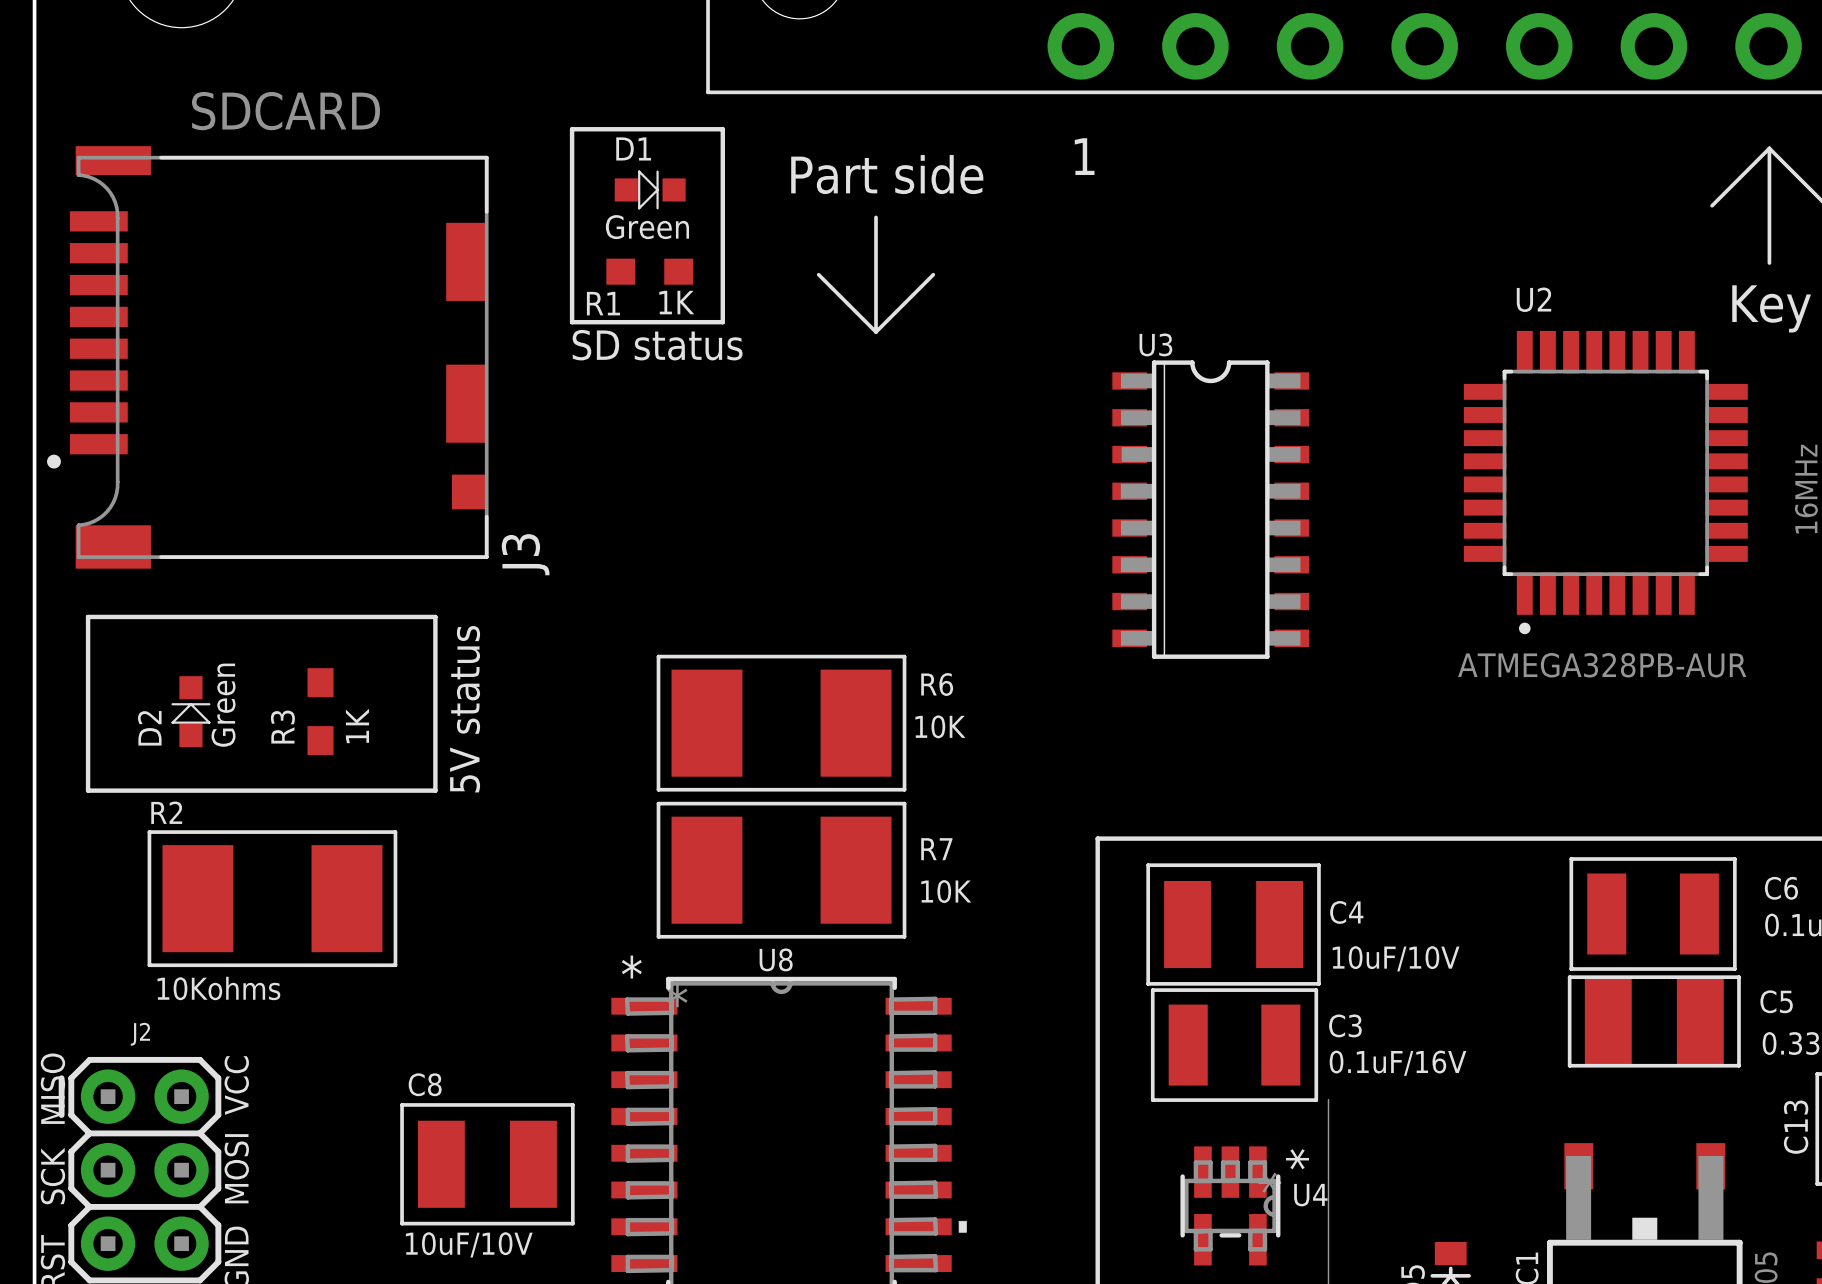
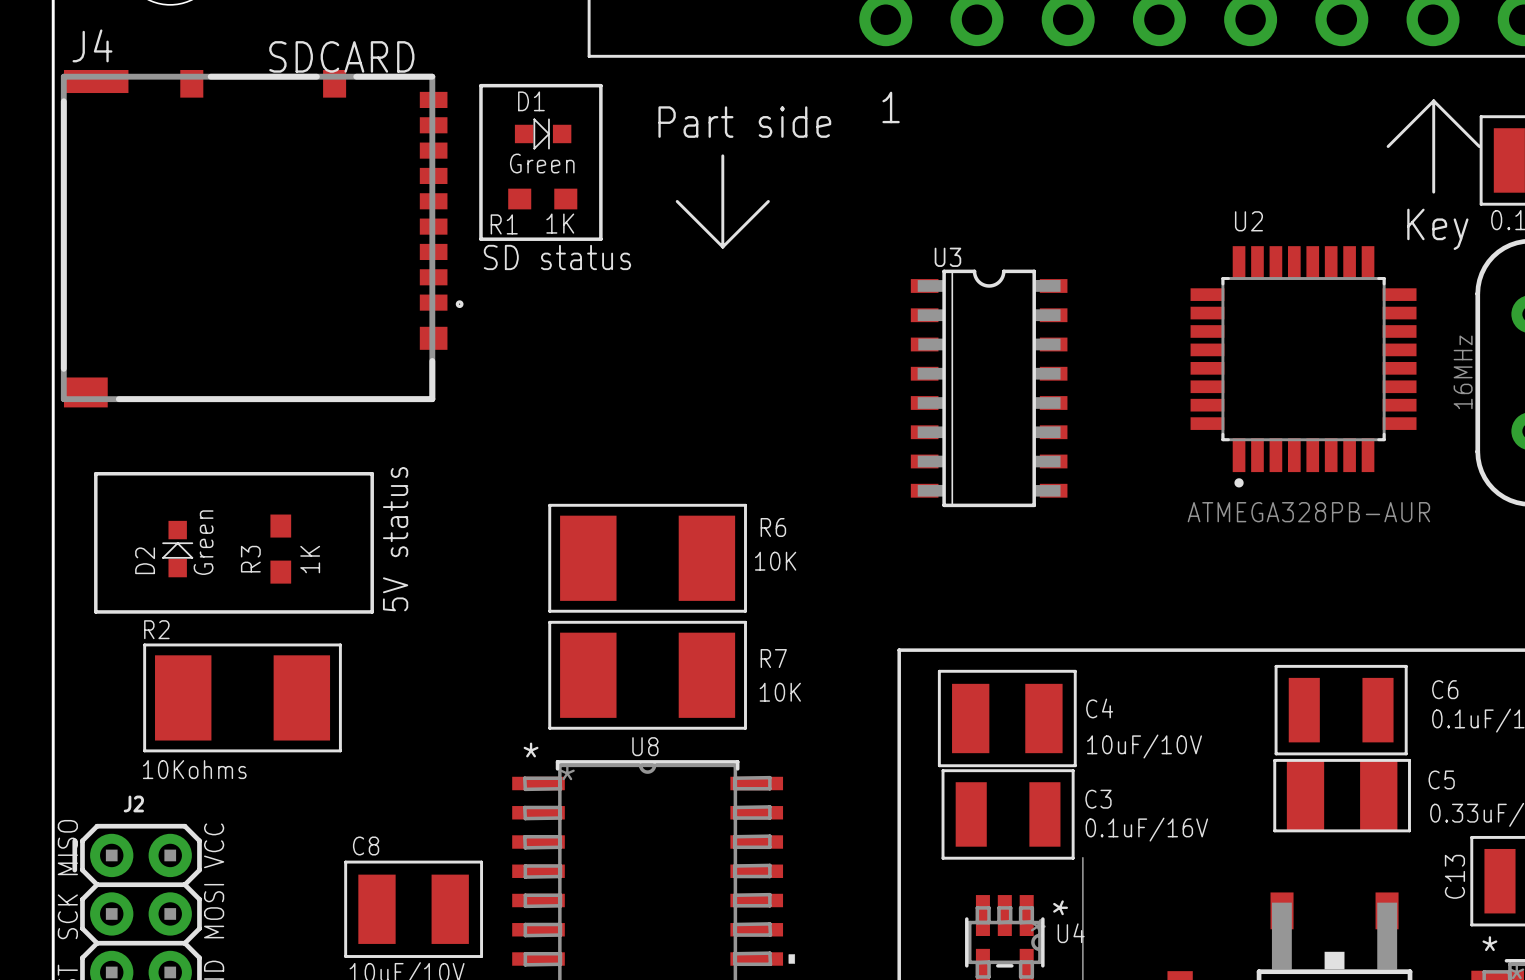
text: none -> SDCARD (341, 56)
J4: none -> (262, 238)
J3: SDCARD (267, 357) -> none

